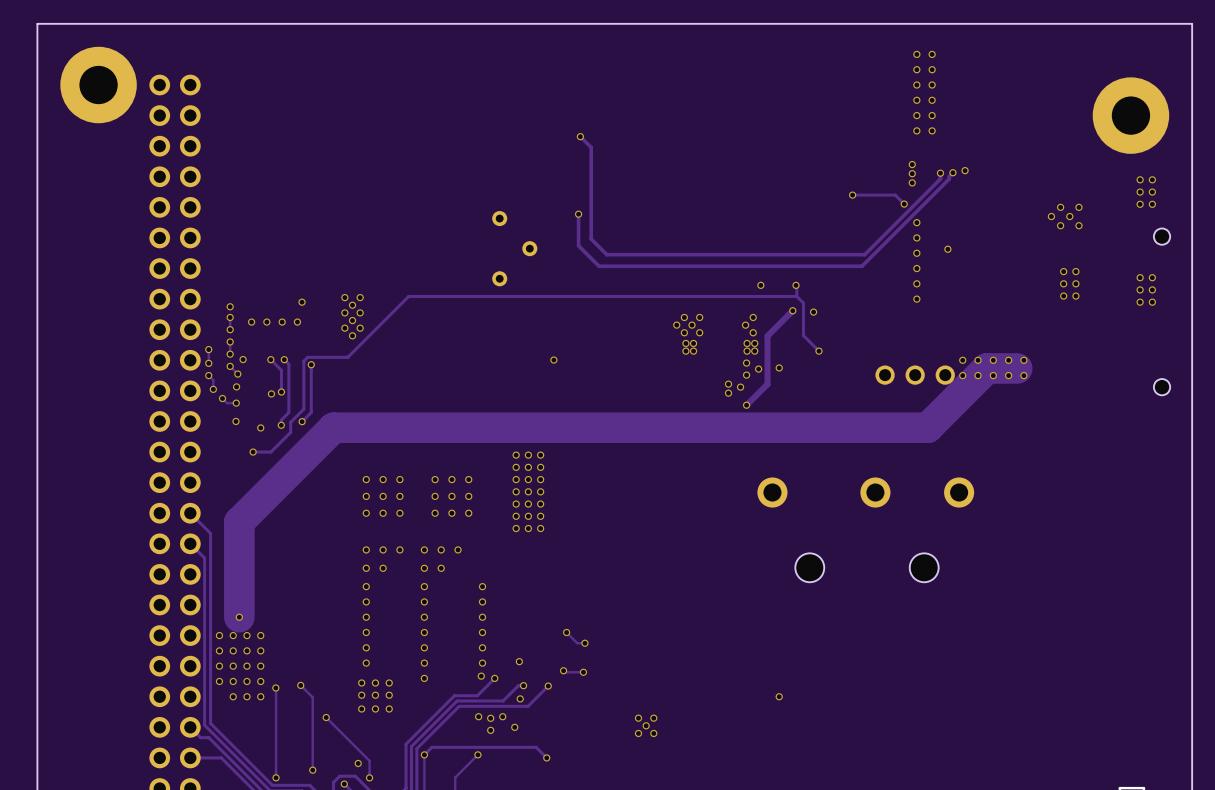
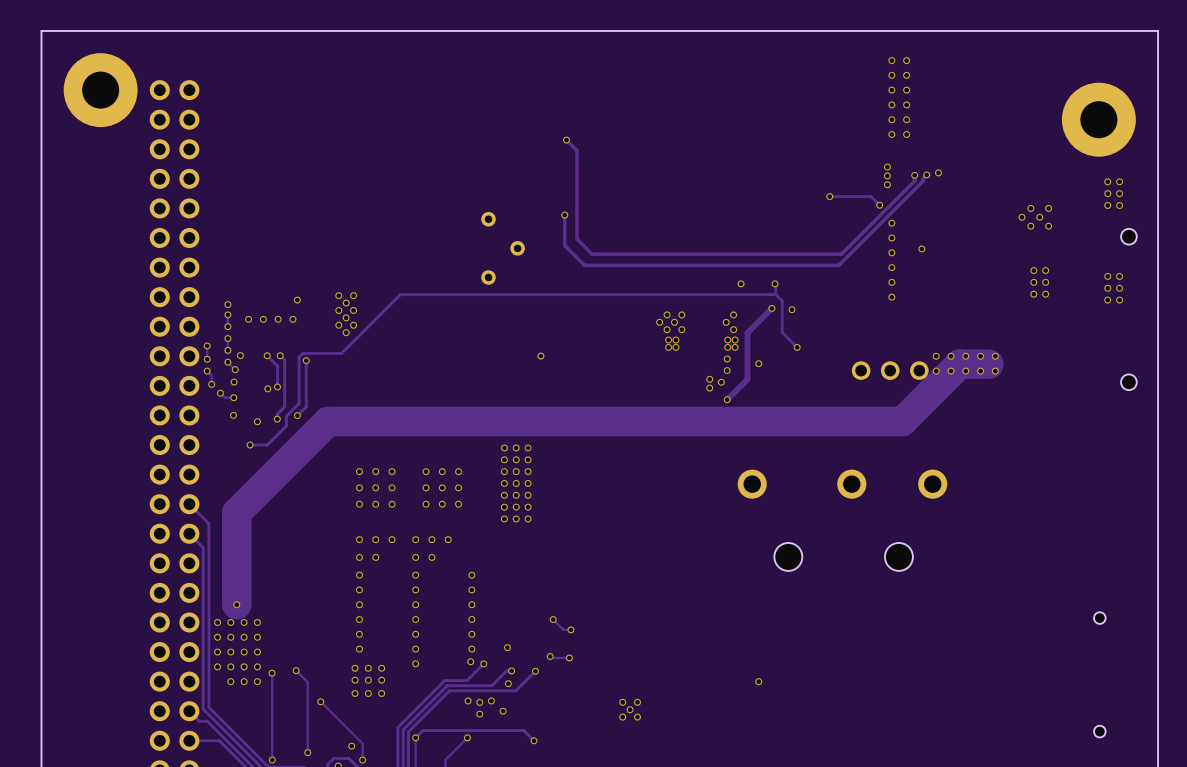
via: (758, 369) -> none
part: none -> (1099, 618)
part: none -> (1099, 731)

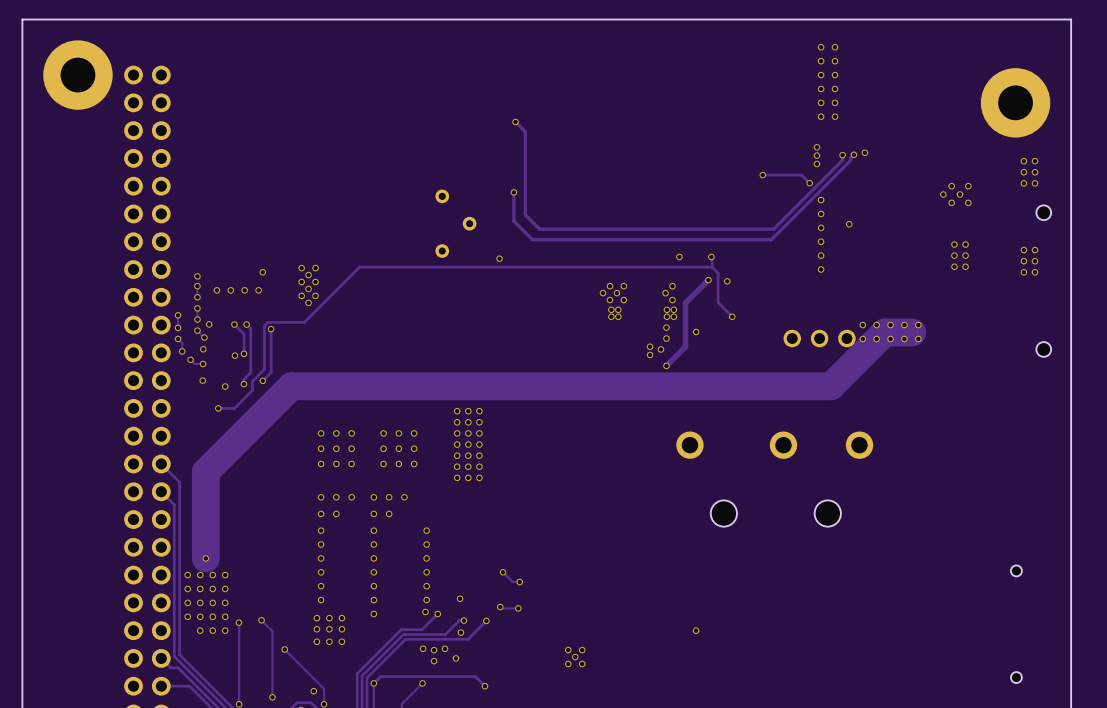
via: none -> (499, 258)
via: (540, 356) -> none

